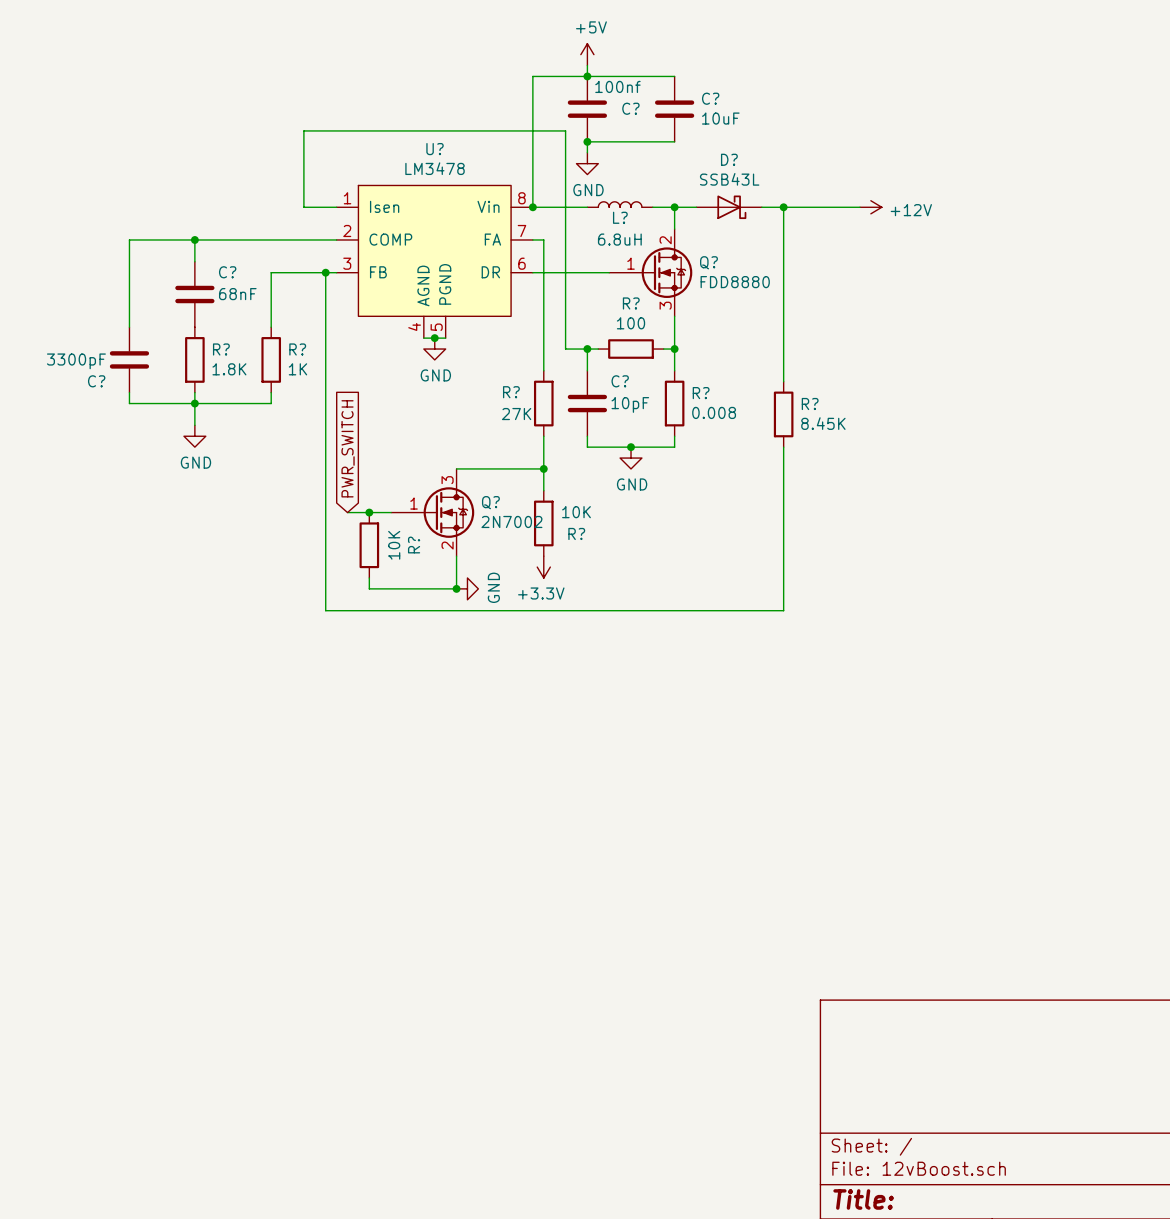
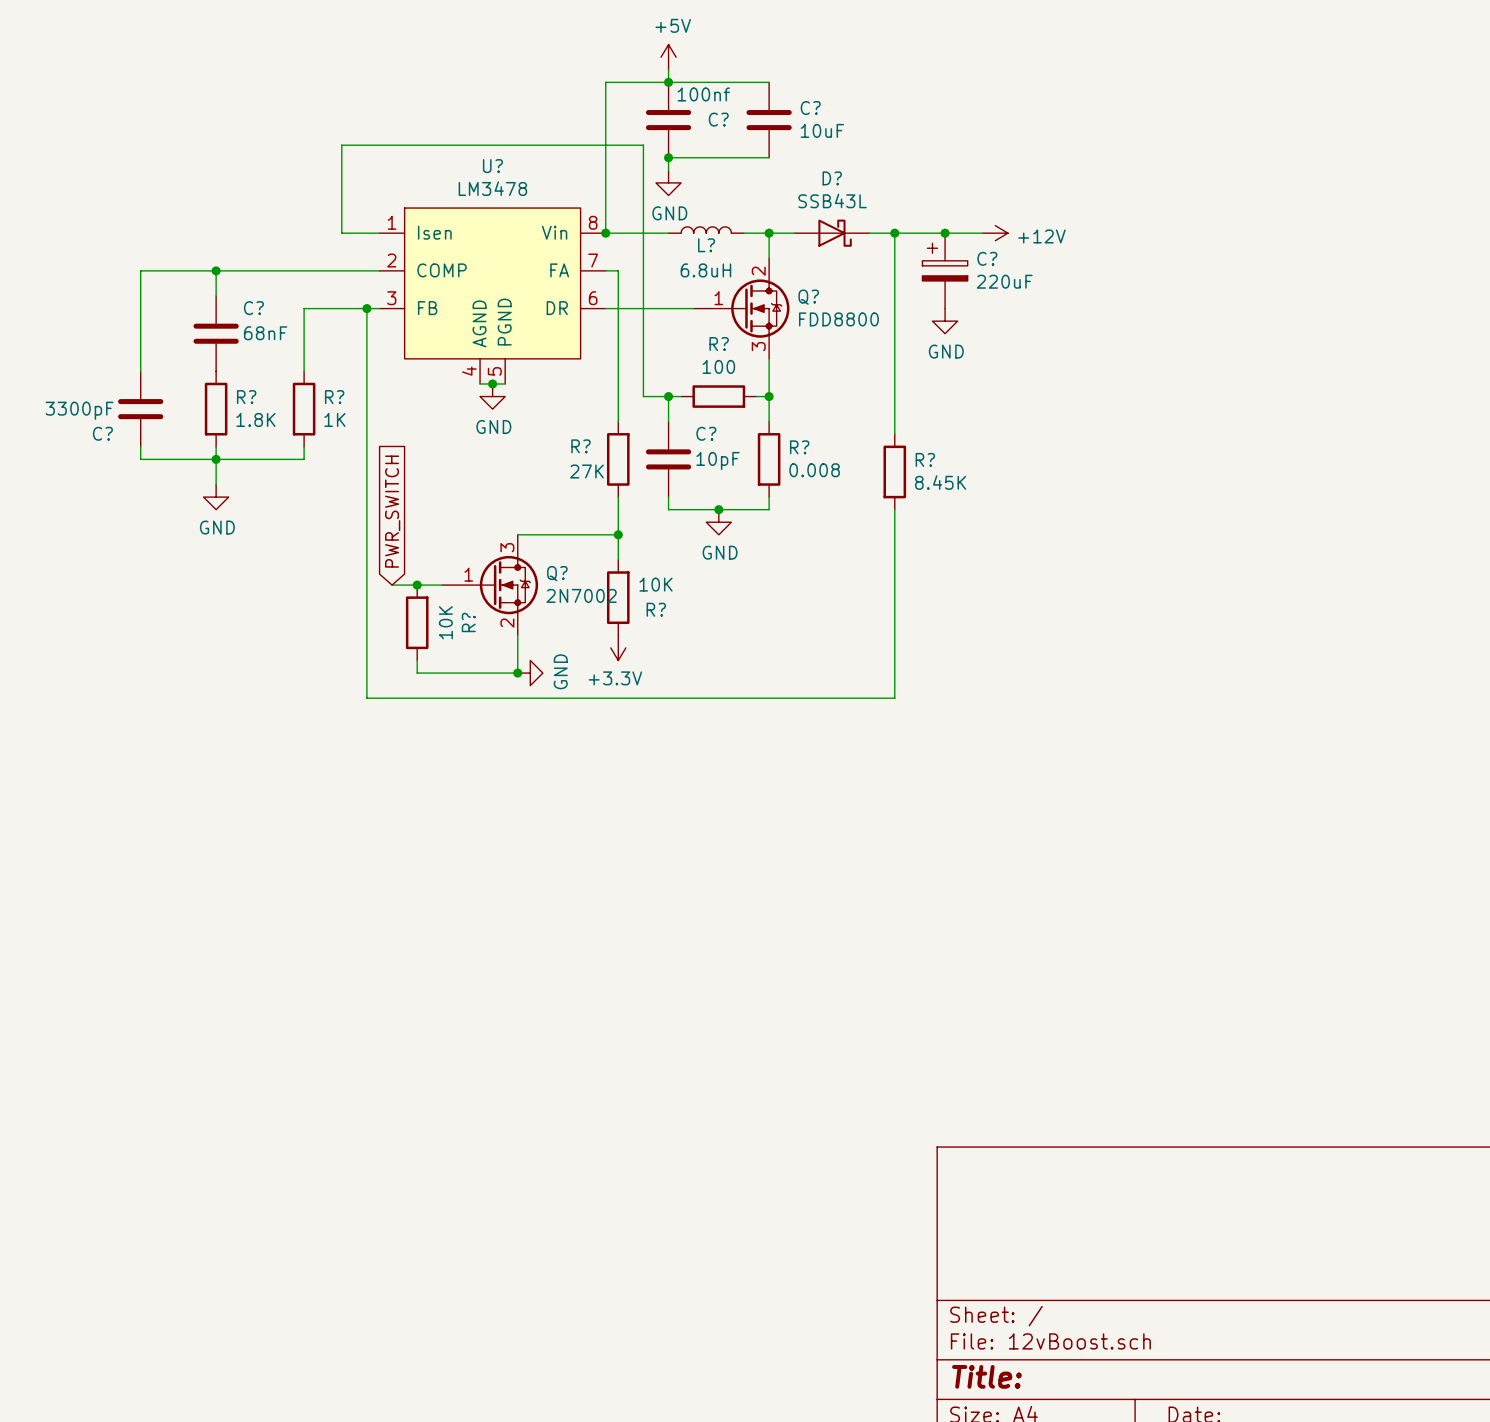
junction: none -> (945, 233)
C?: none -> 220uF (945, 270)
Q? value: FDD8880 (735, 282) -> FDD8800 (838, 319)
power symbol: none -> GND (945, 321)

